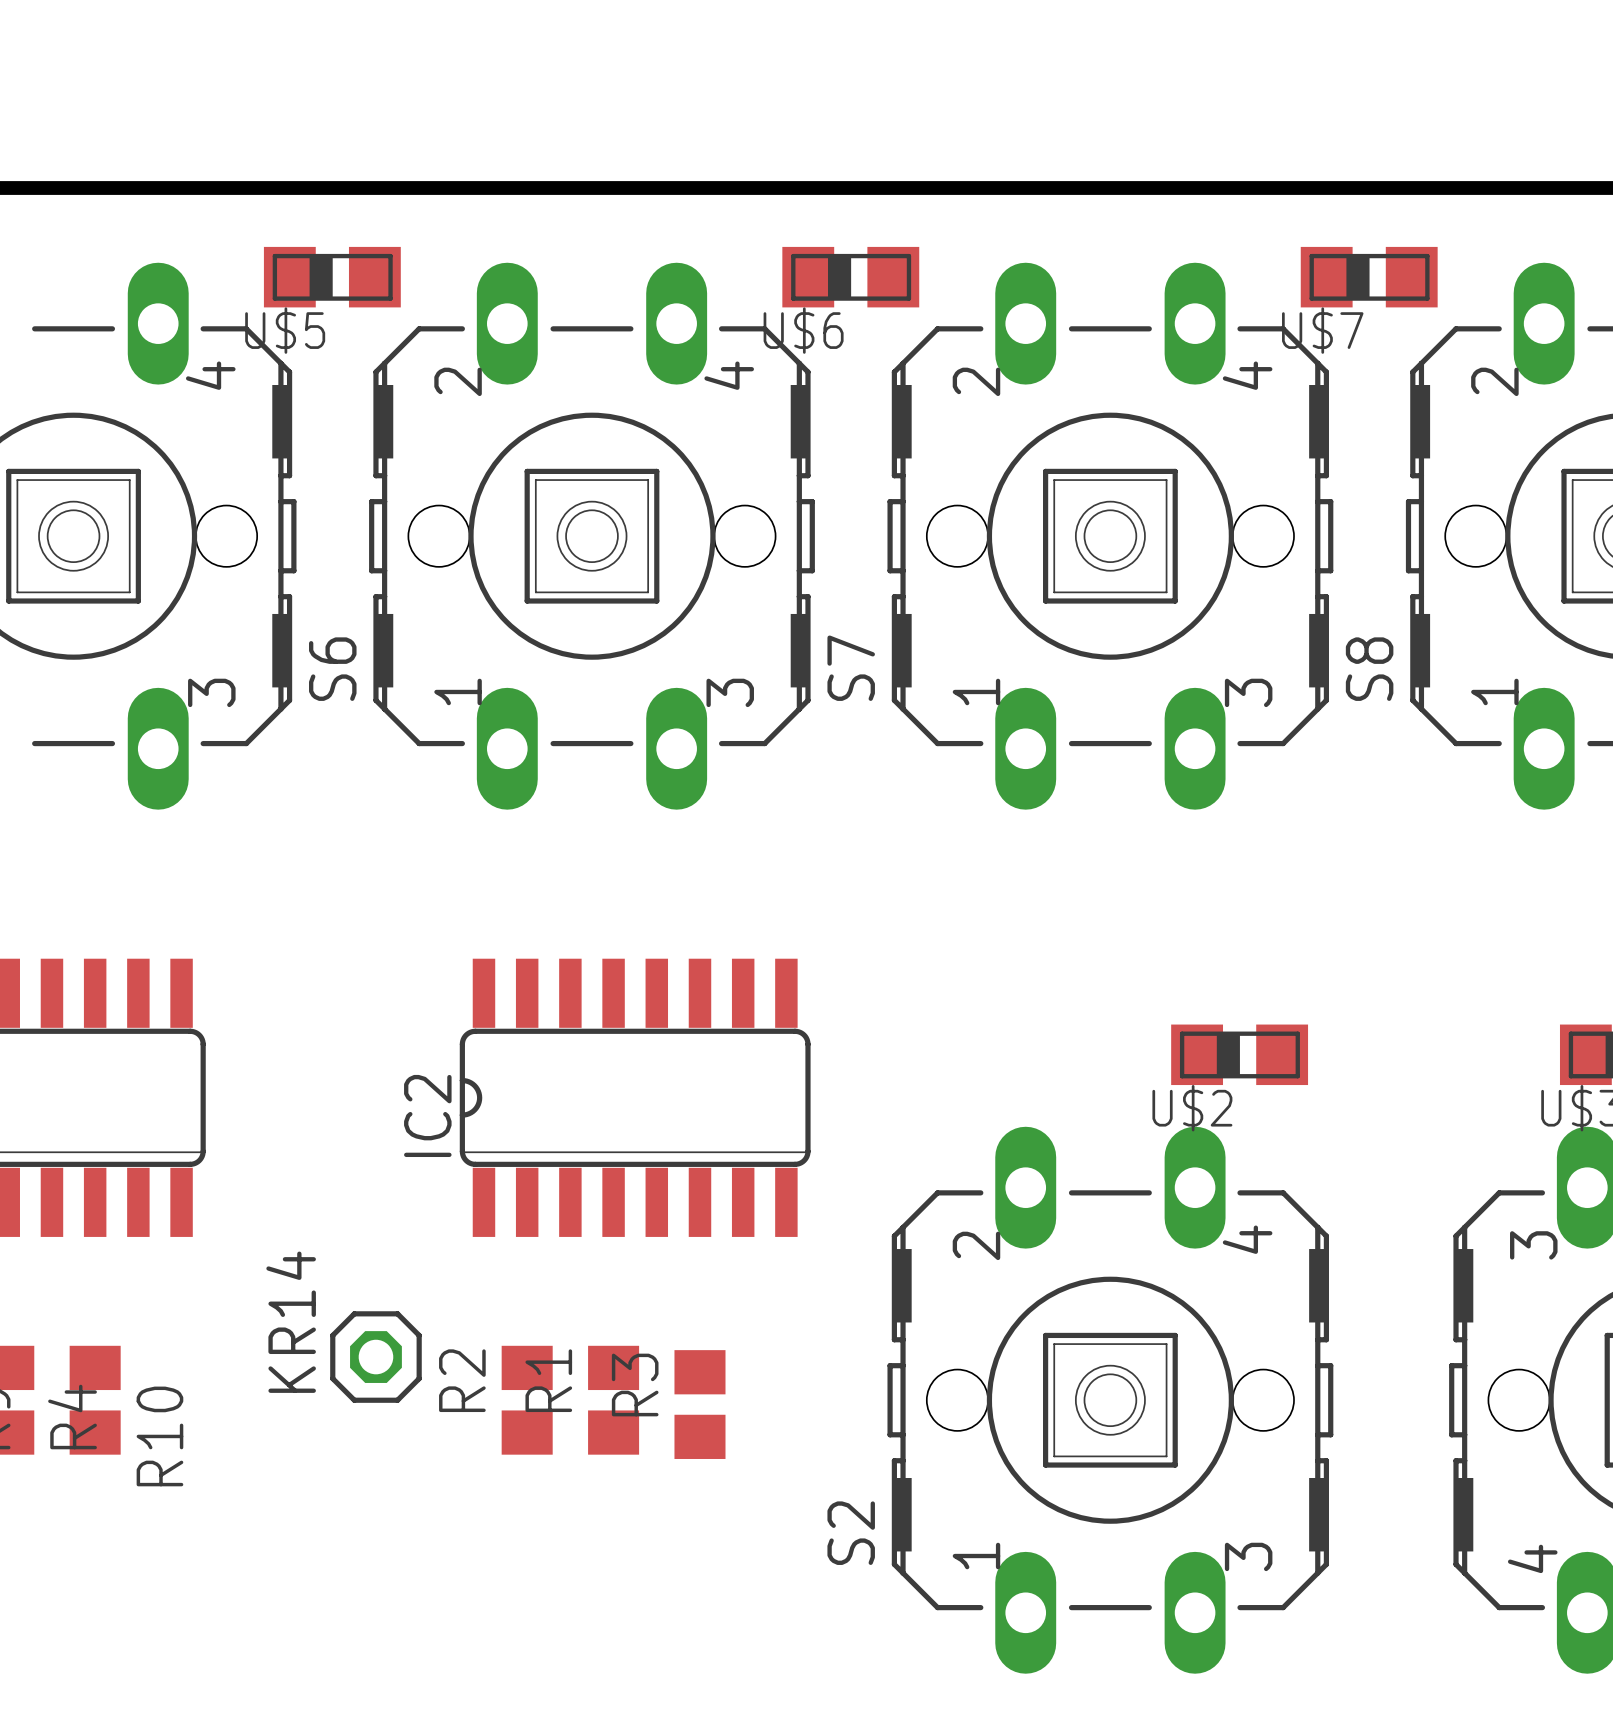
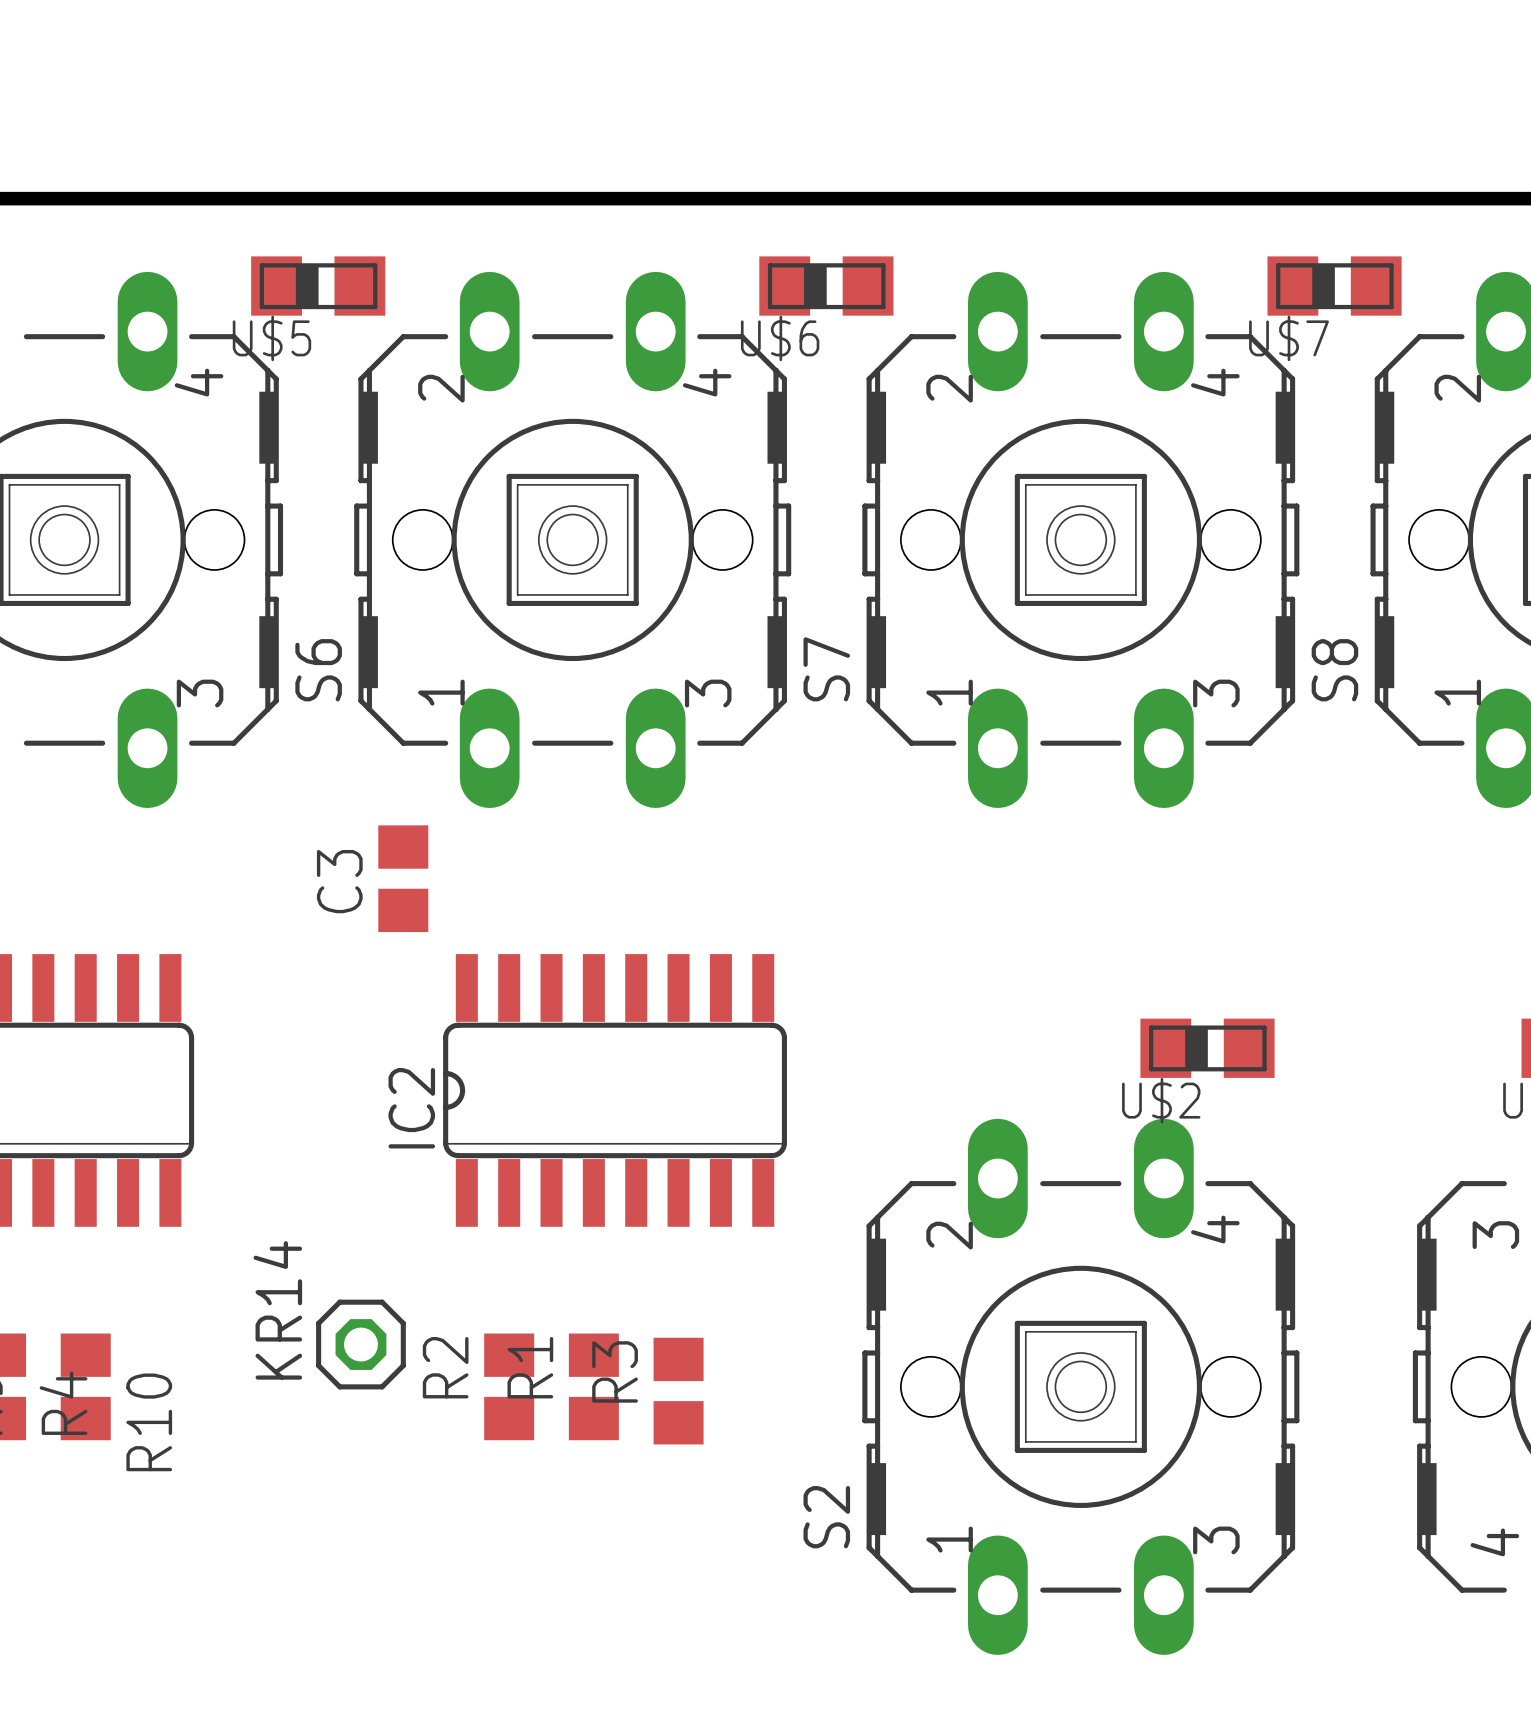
C3: none -> (403, 878)

